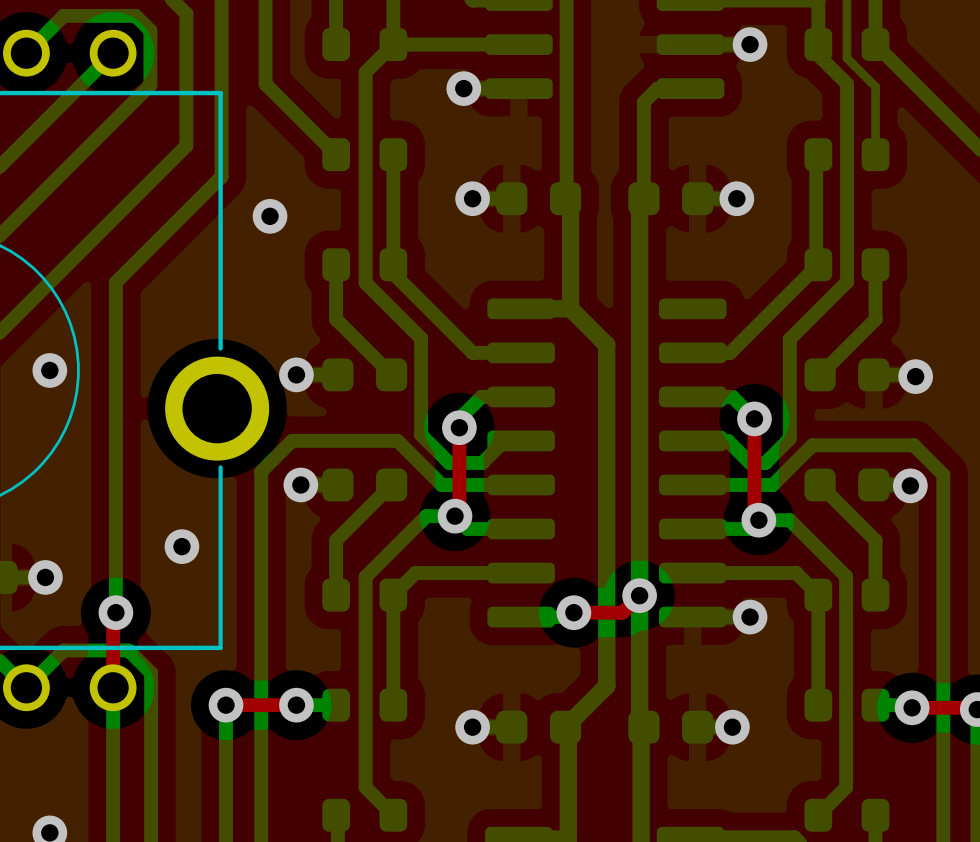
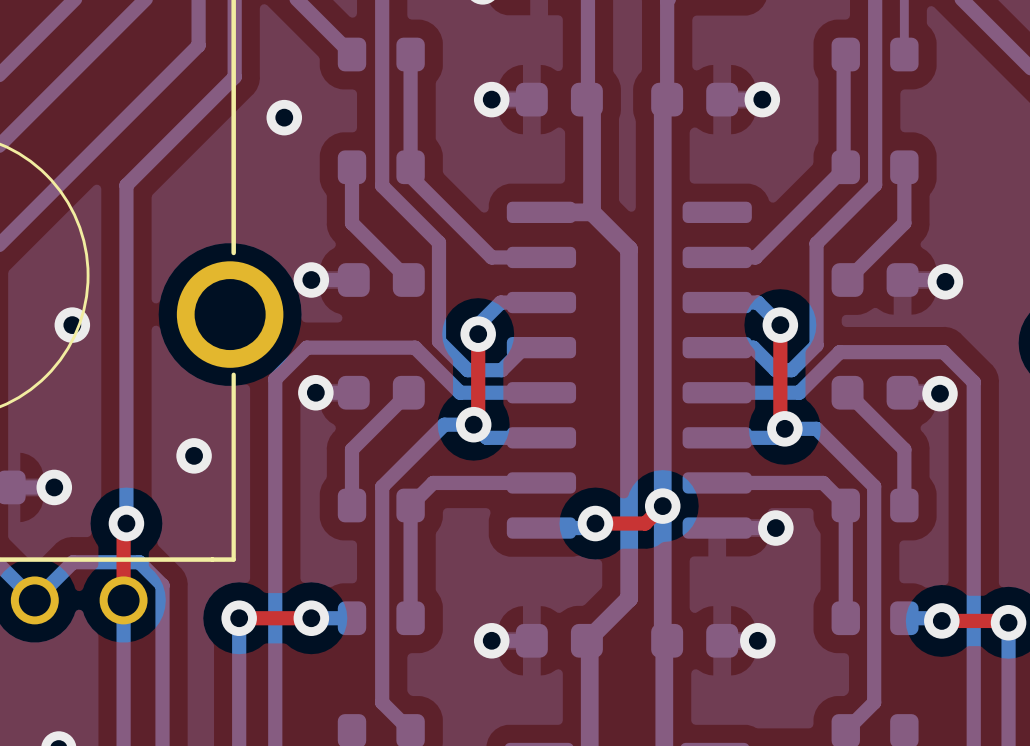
via position: (49, 370) -> (72, 325)

